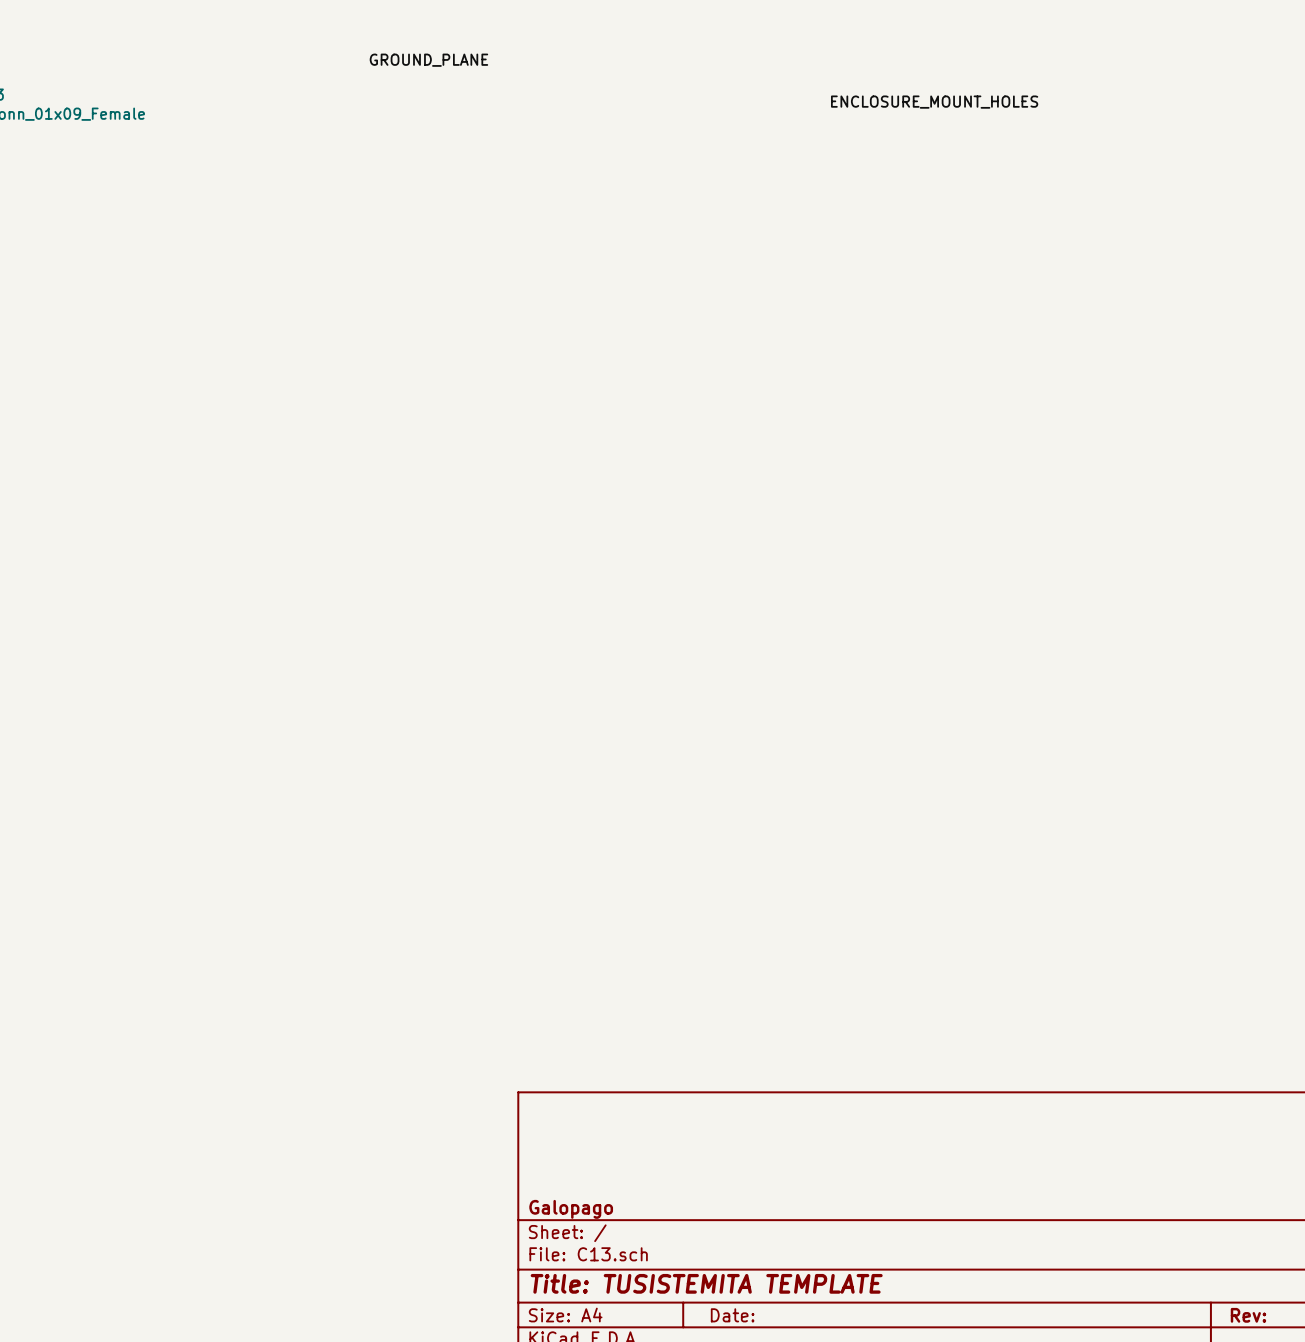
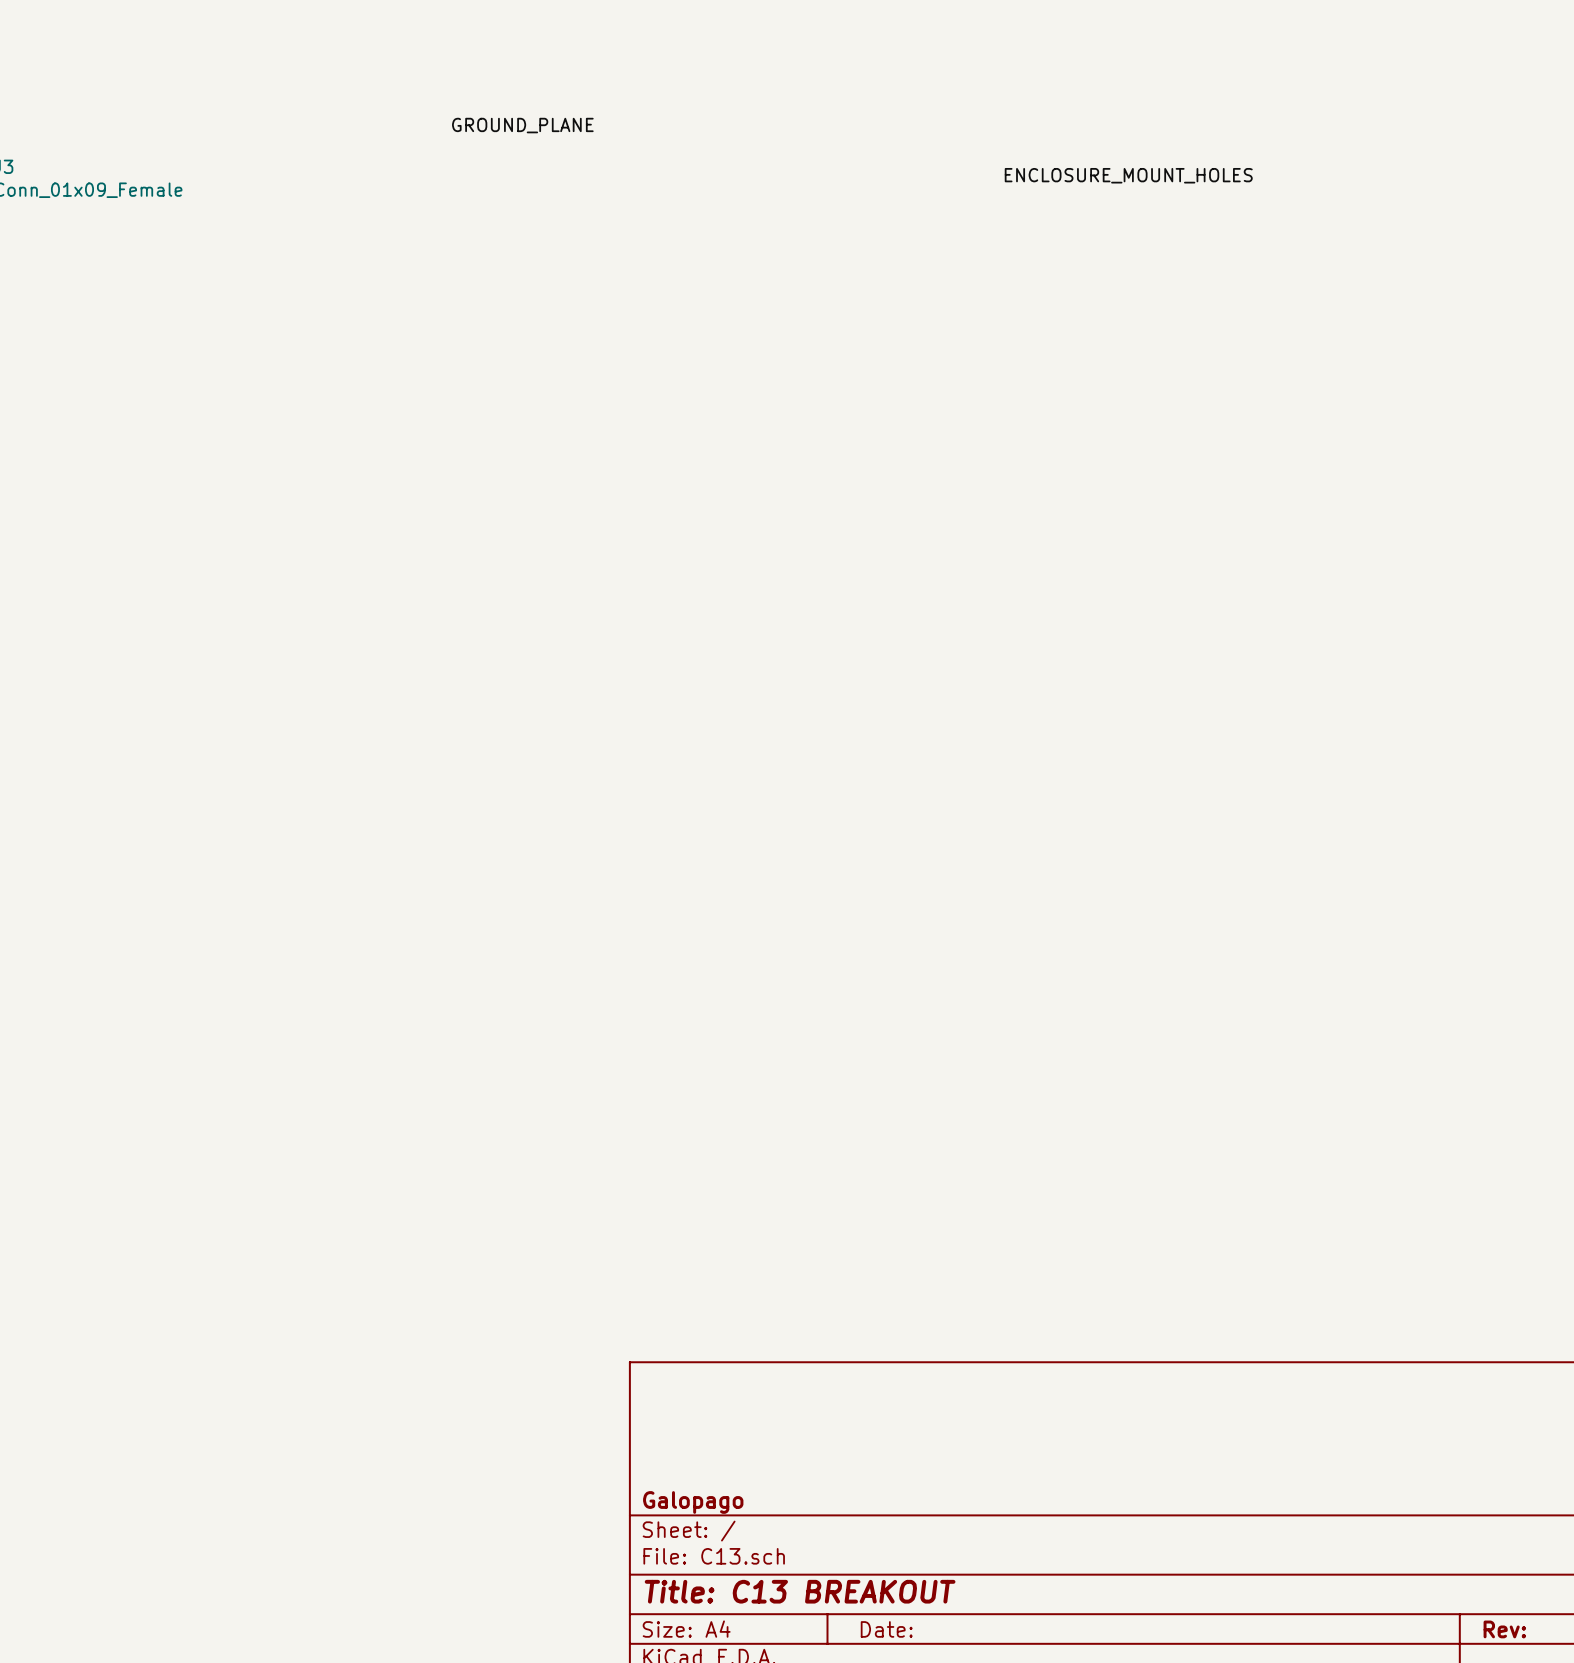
title block: Title: TUSISTEMITA TEMPLATE (706, 1283) -> Title: C13 BREAKOUT (800, 1591)

